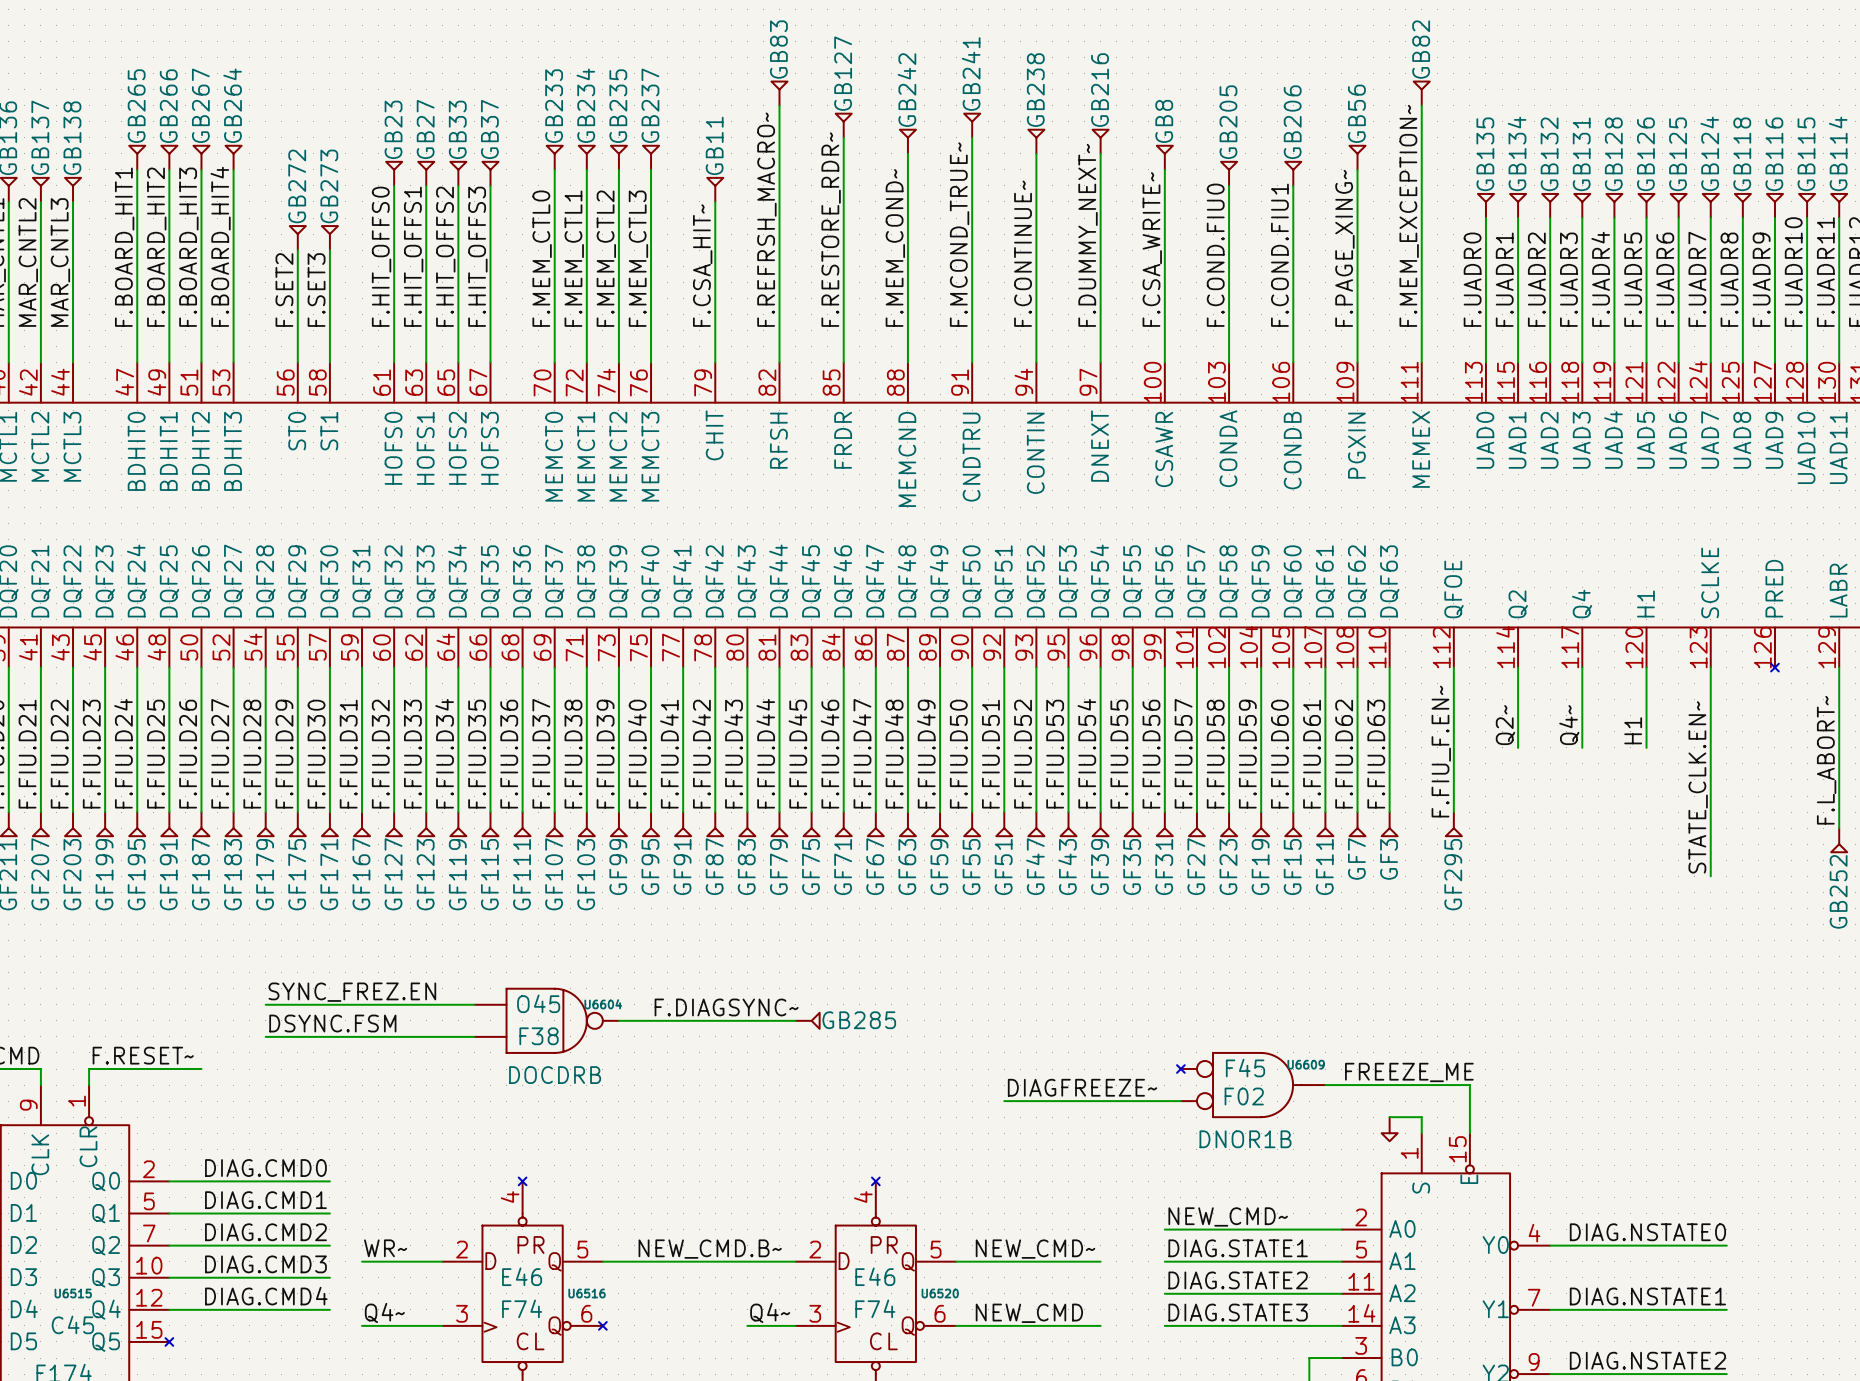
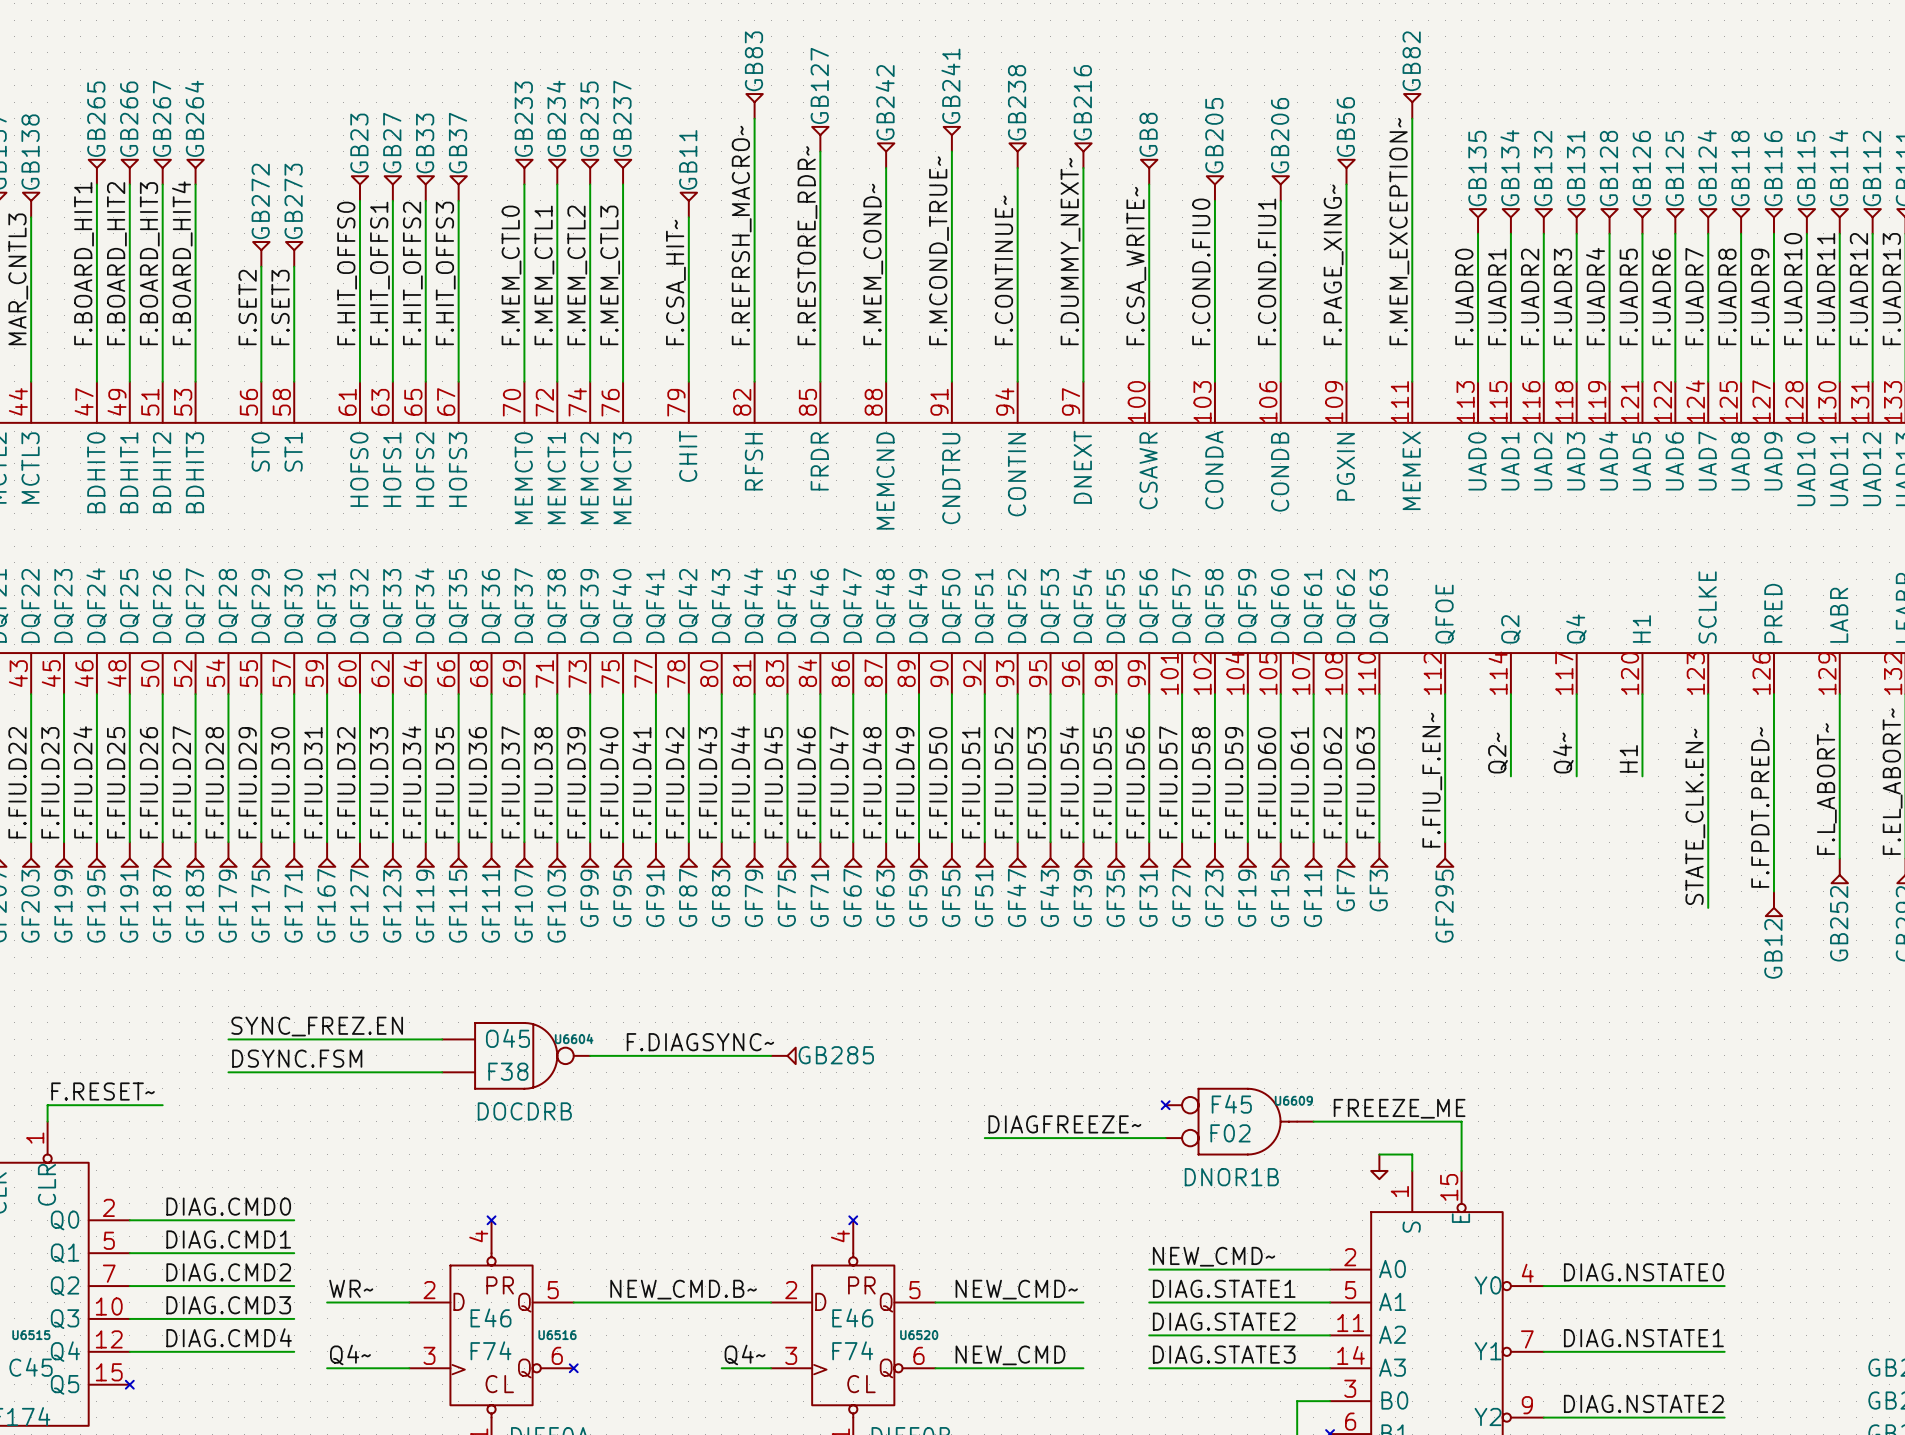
wire: none -> (1773, 694) (1773, 891)
no-connect mark: (1774, 667) -> none
label: none -> F.FPDT.PRED~ (1760, 807)
GB12: none -> (1773, 904)

